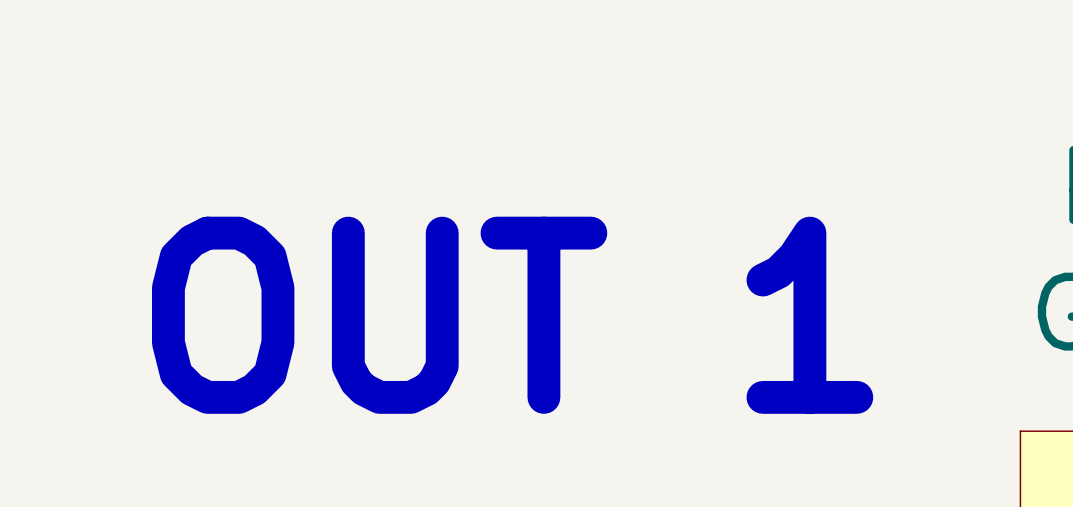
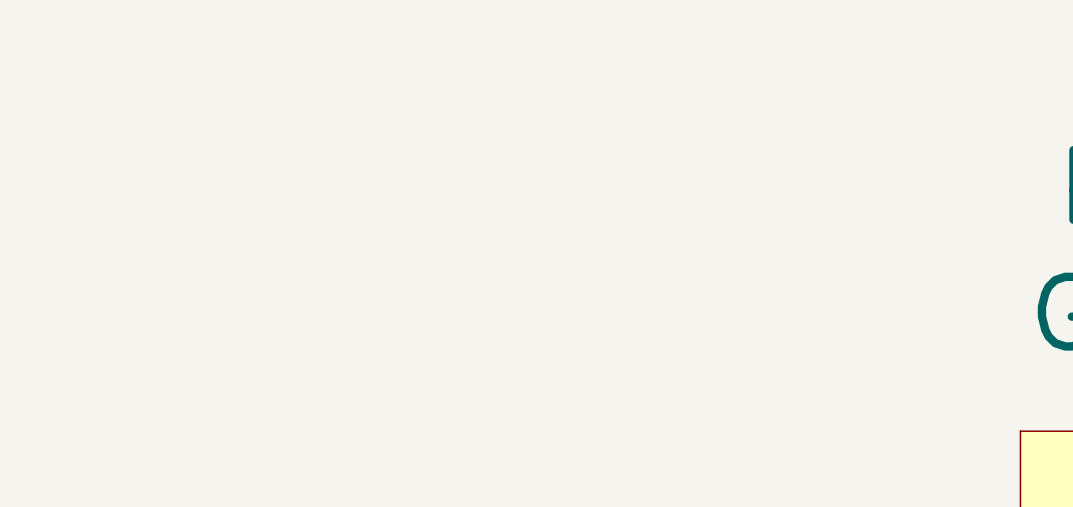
text: OUT 1 (512, 315) -> none

